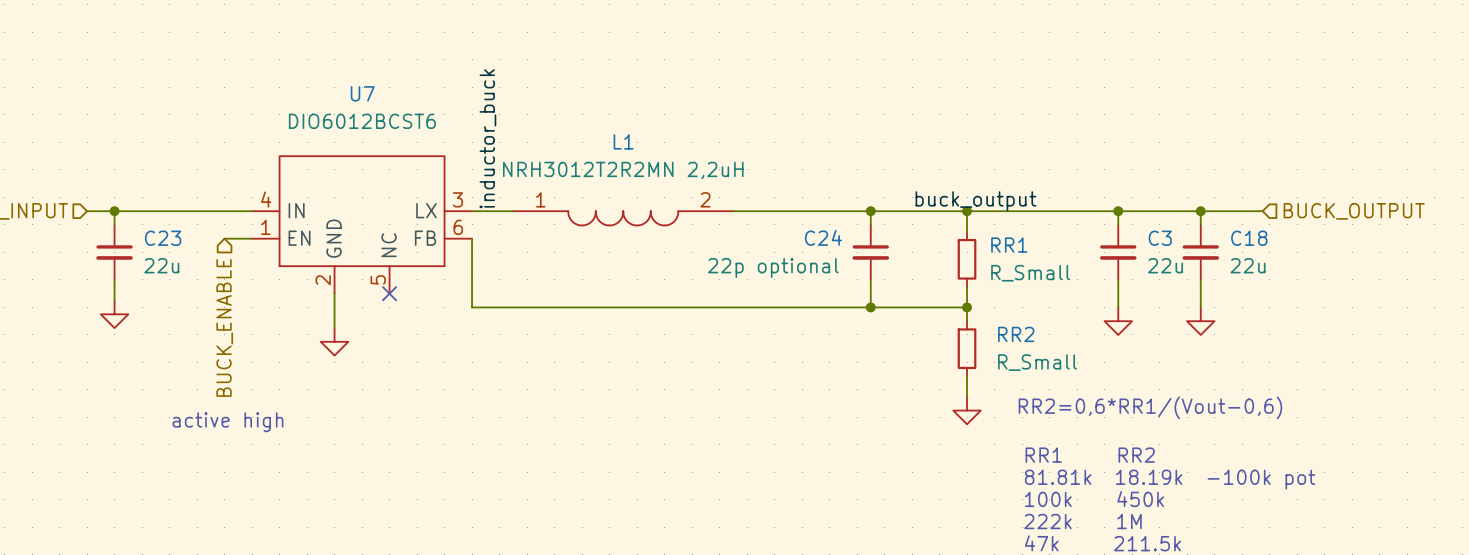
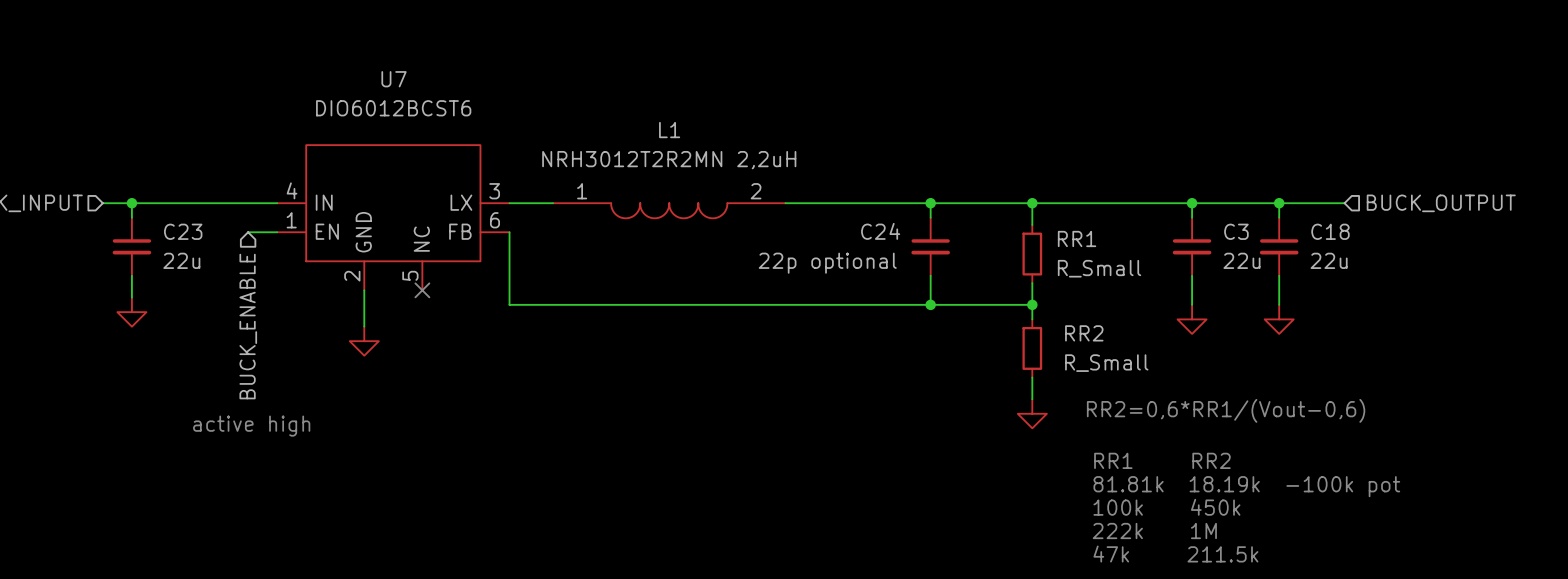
label: inductor_buck (487, 138) -> none
label: buck_output (975, 201) -> none

